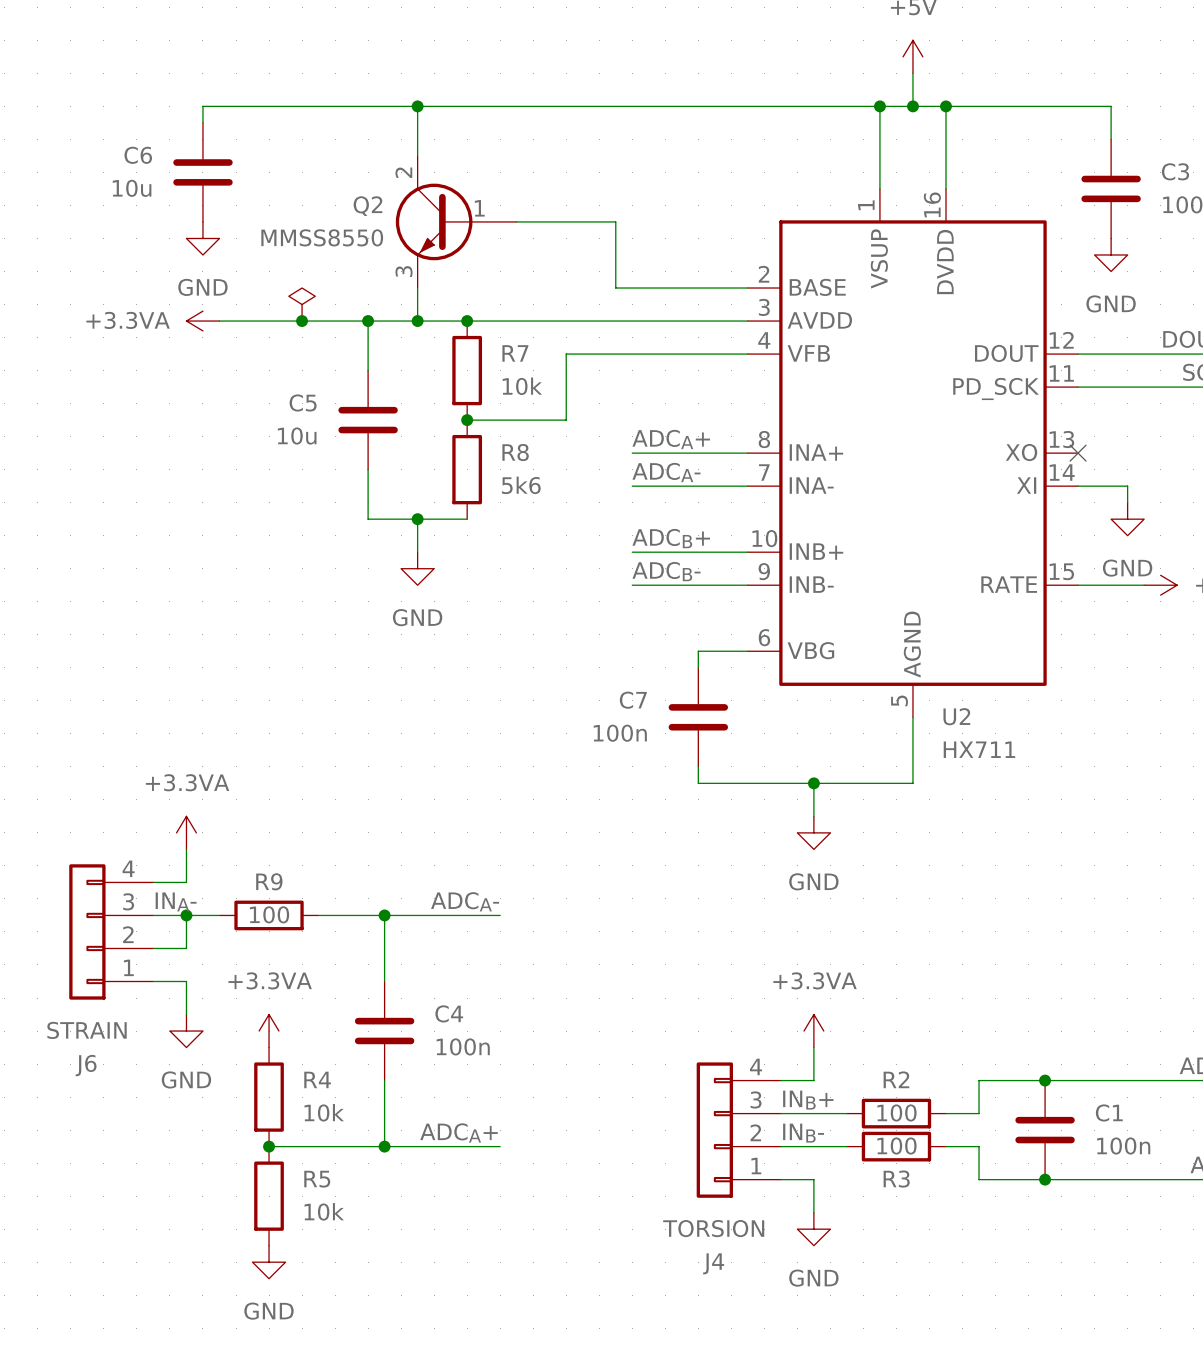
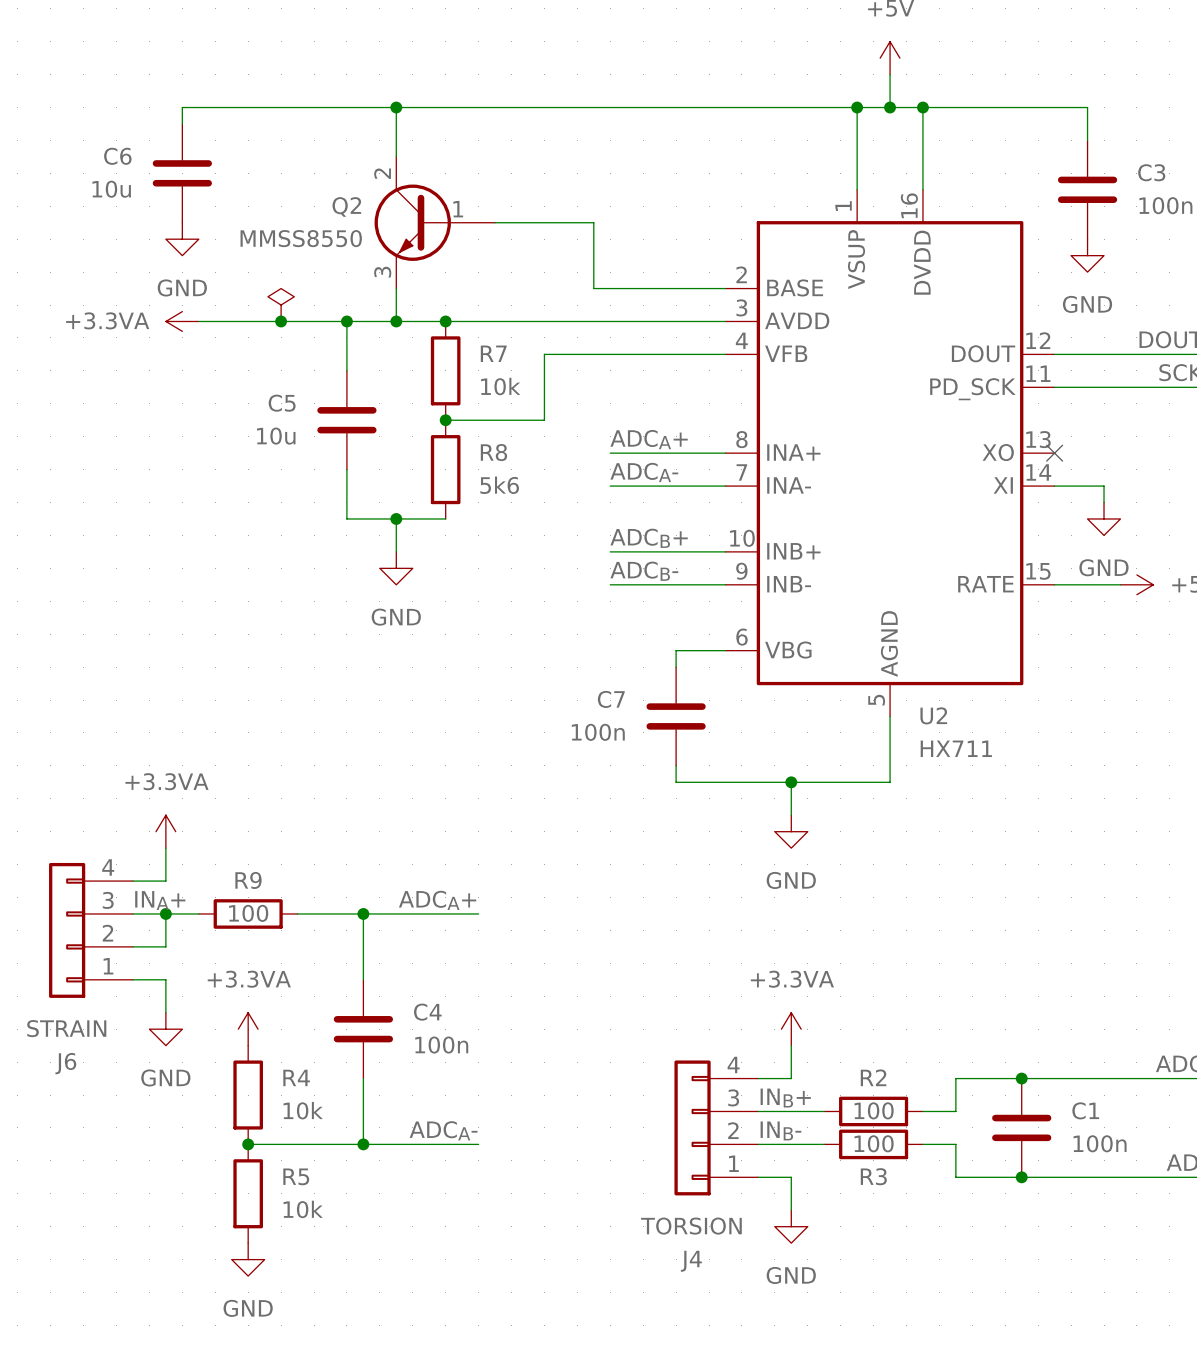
label: INA- (176, 901) -> INA+ (160, 900)
label: ADCA- (465, 901) -> ADCA+ (437, 900)
label: ADCA+ (459, 1132) -> ADCA- (443, 1130)

